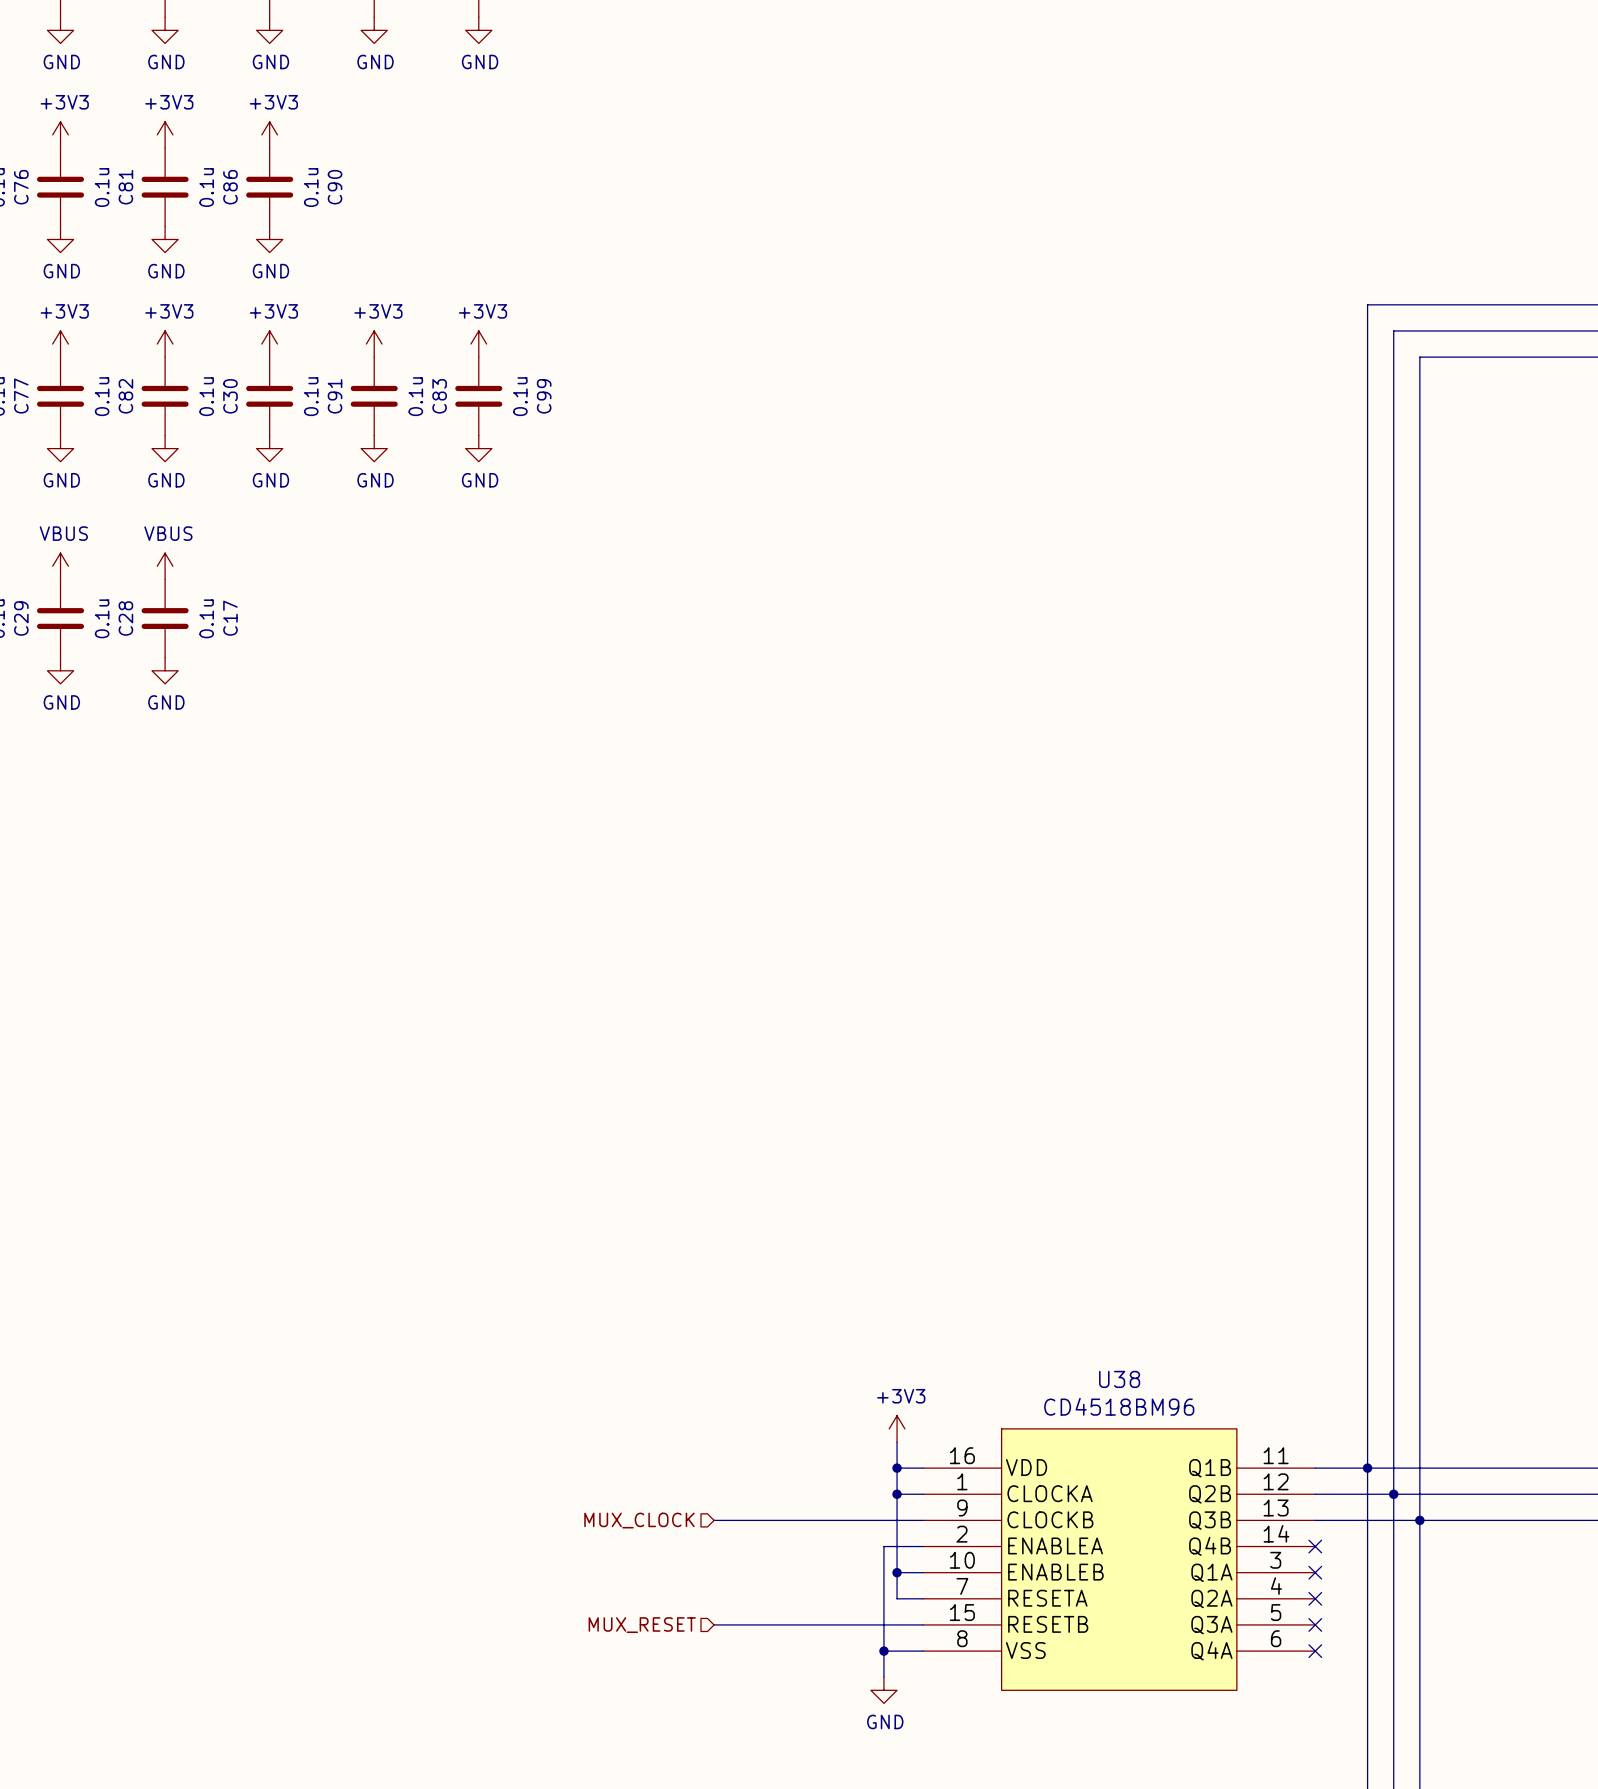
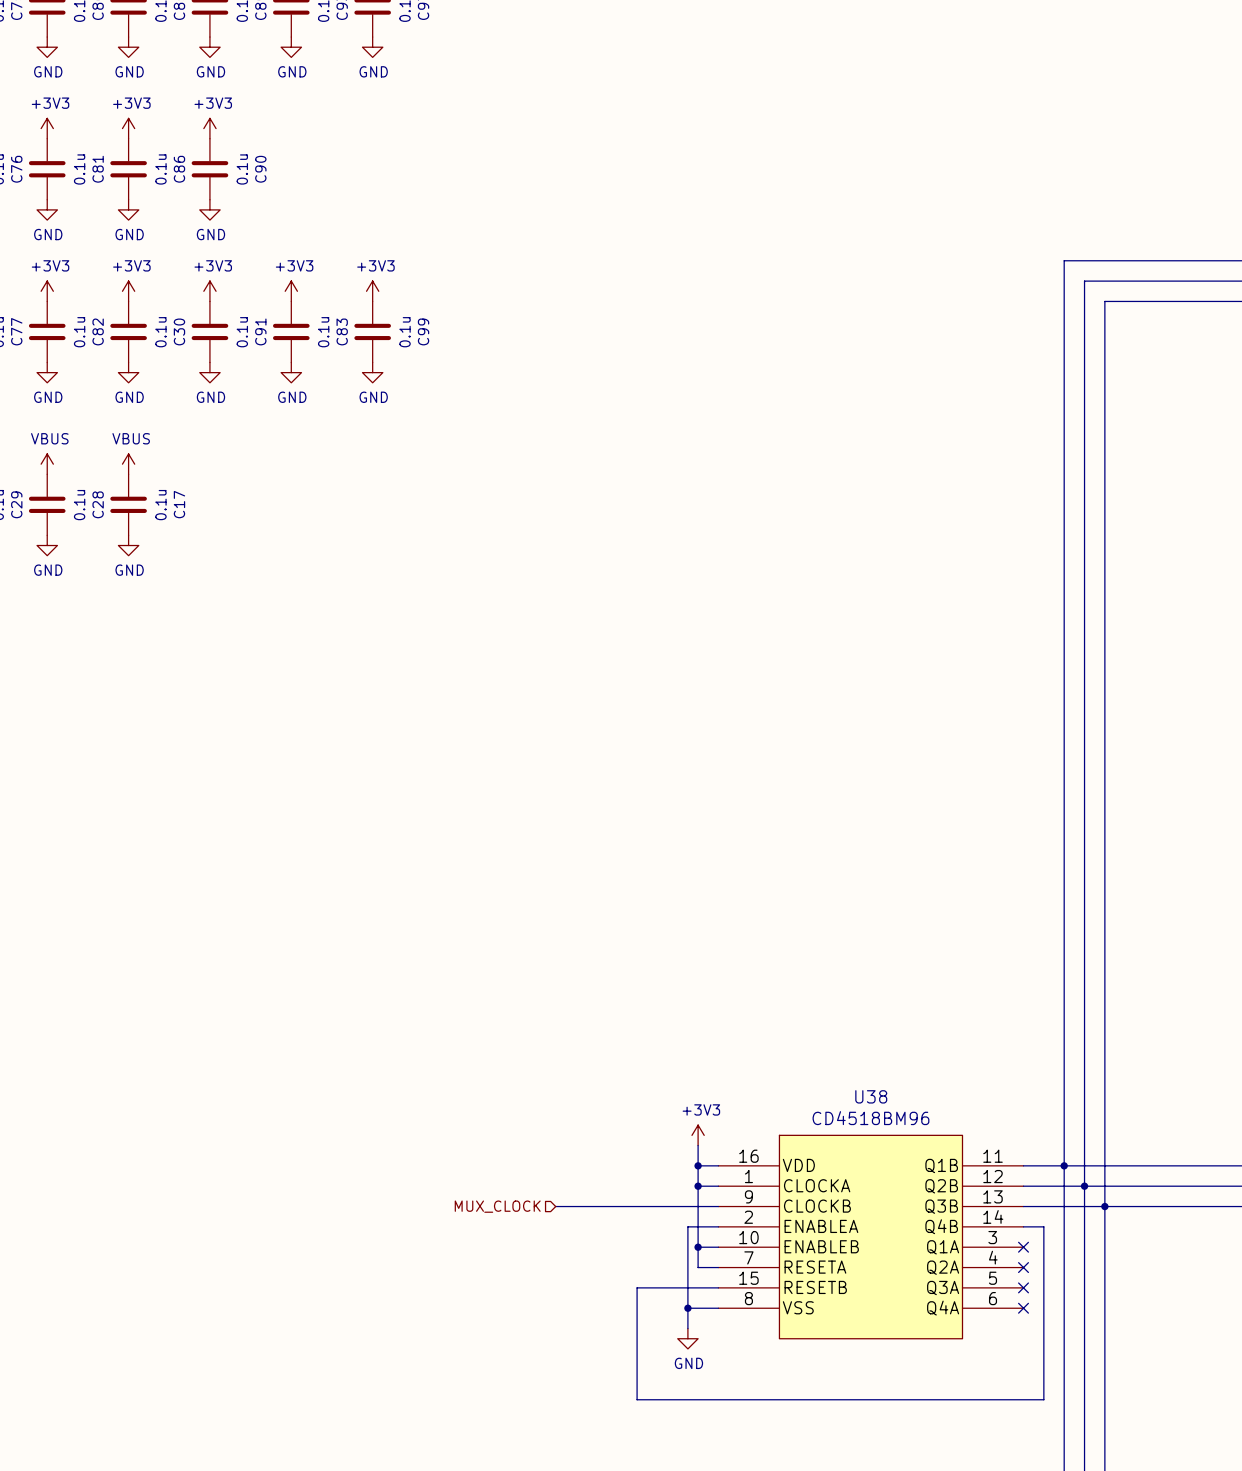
no-connect mark: (1315, 1546) -> none
wire: (714, 1624) (818, 1624) -> (1023, 1226) (1043, 1226) (1043, 1399) (637, 1399) (637, 1287)
hierarchical label: MUX_RESET (642, 1625) -> none

